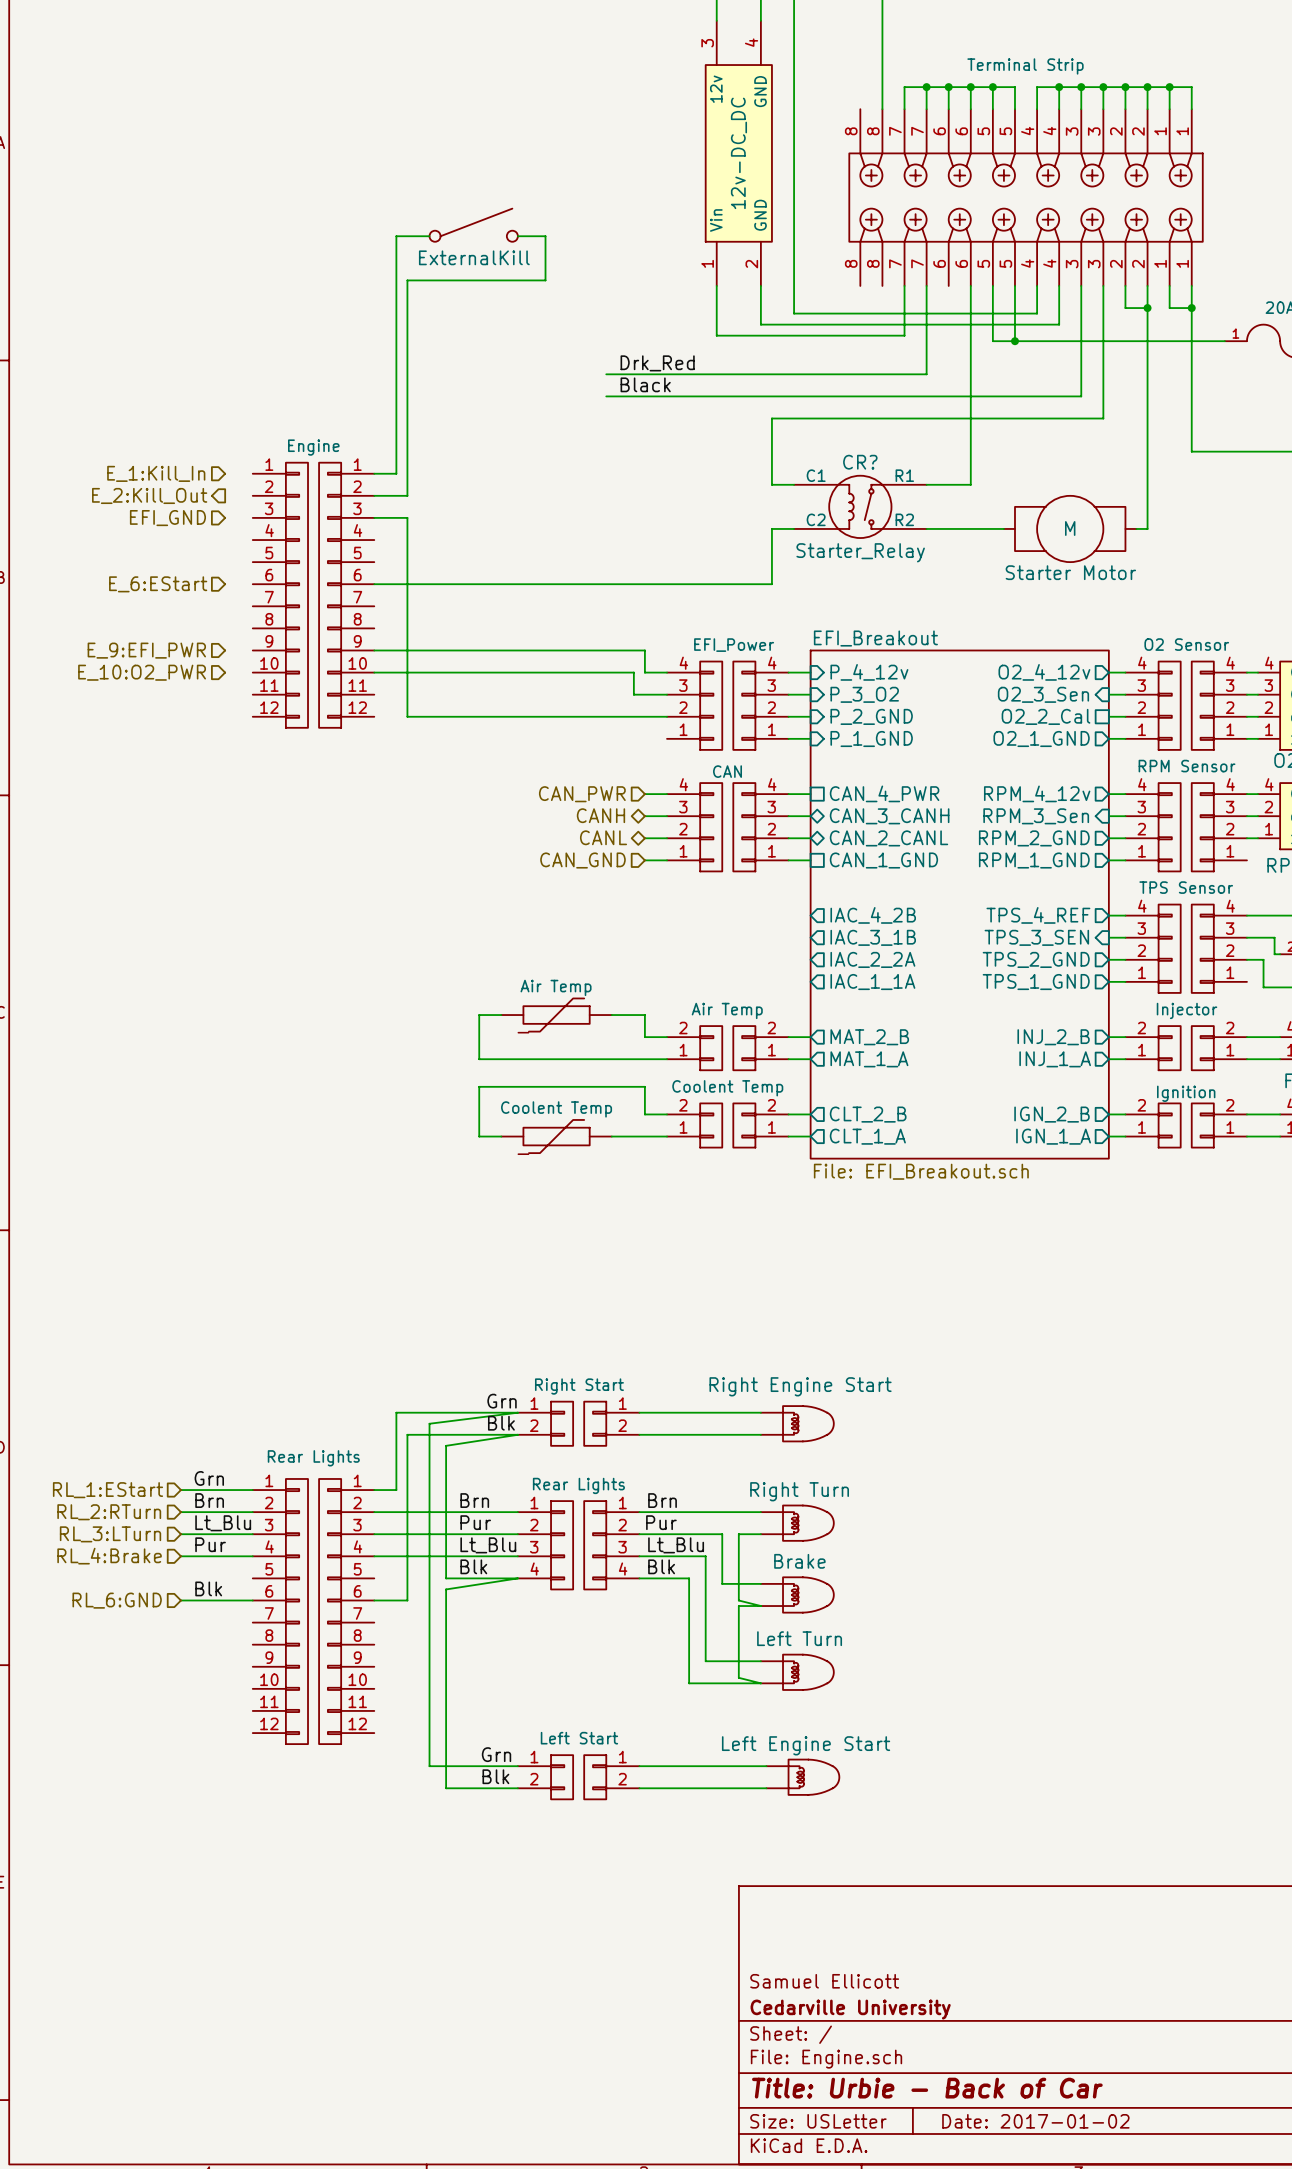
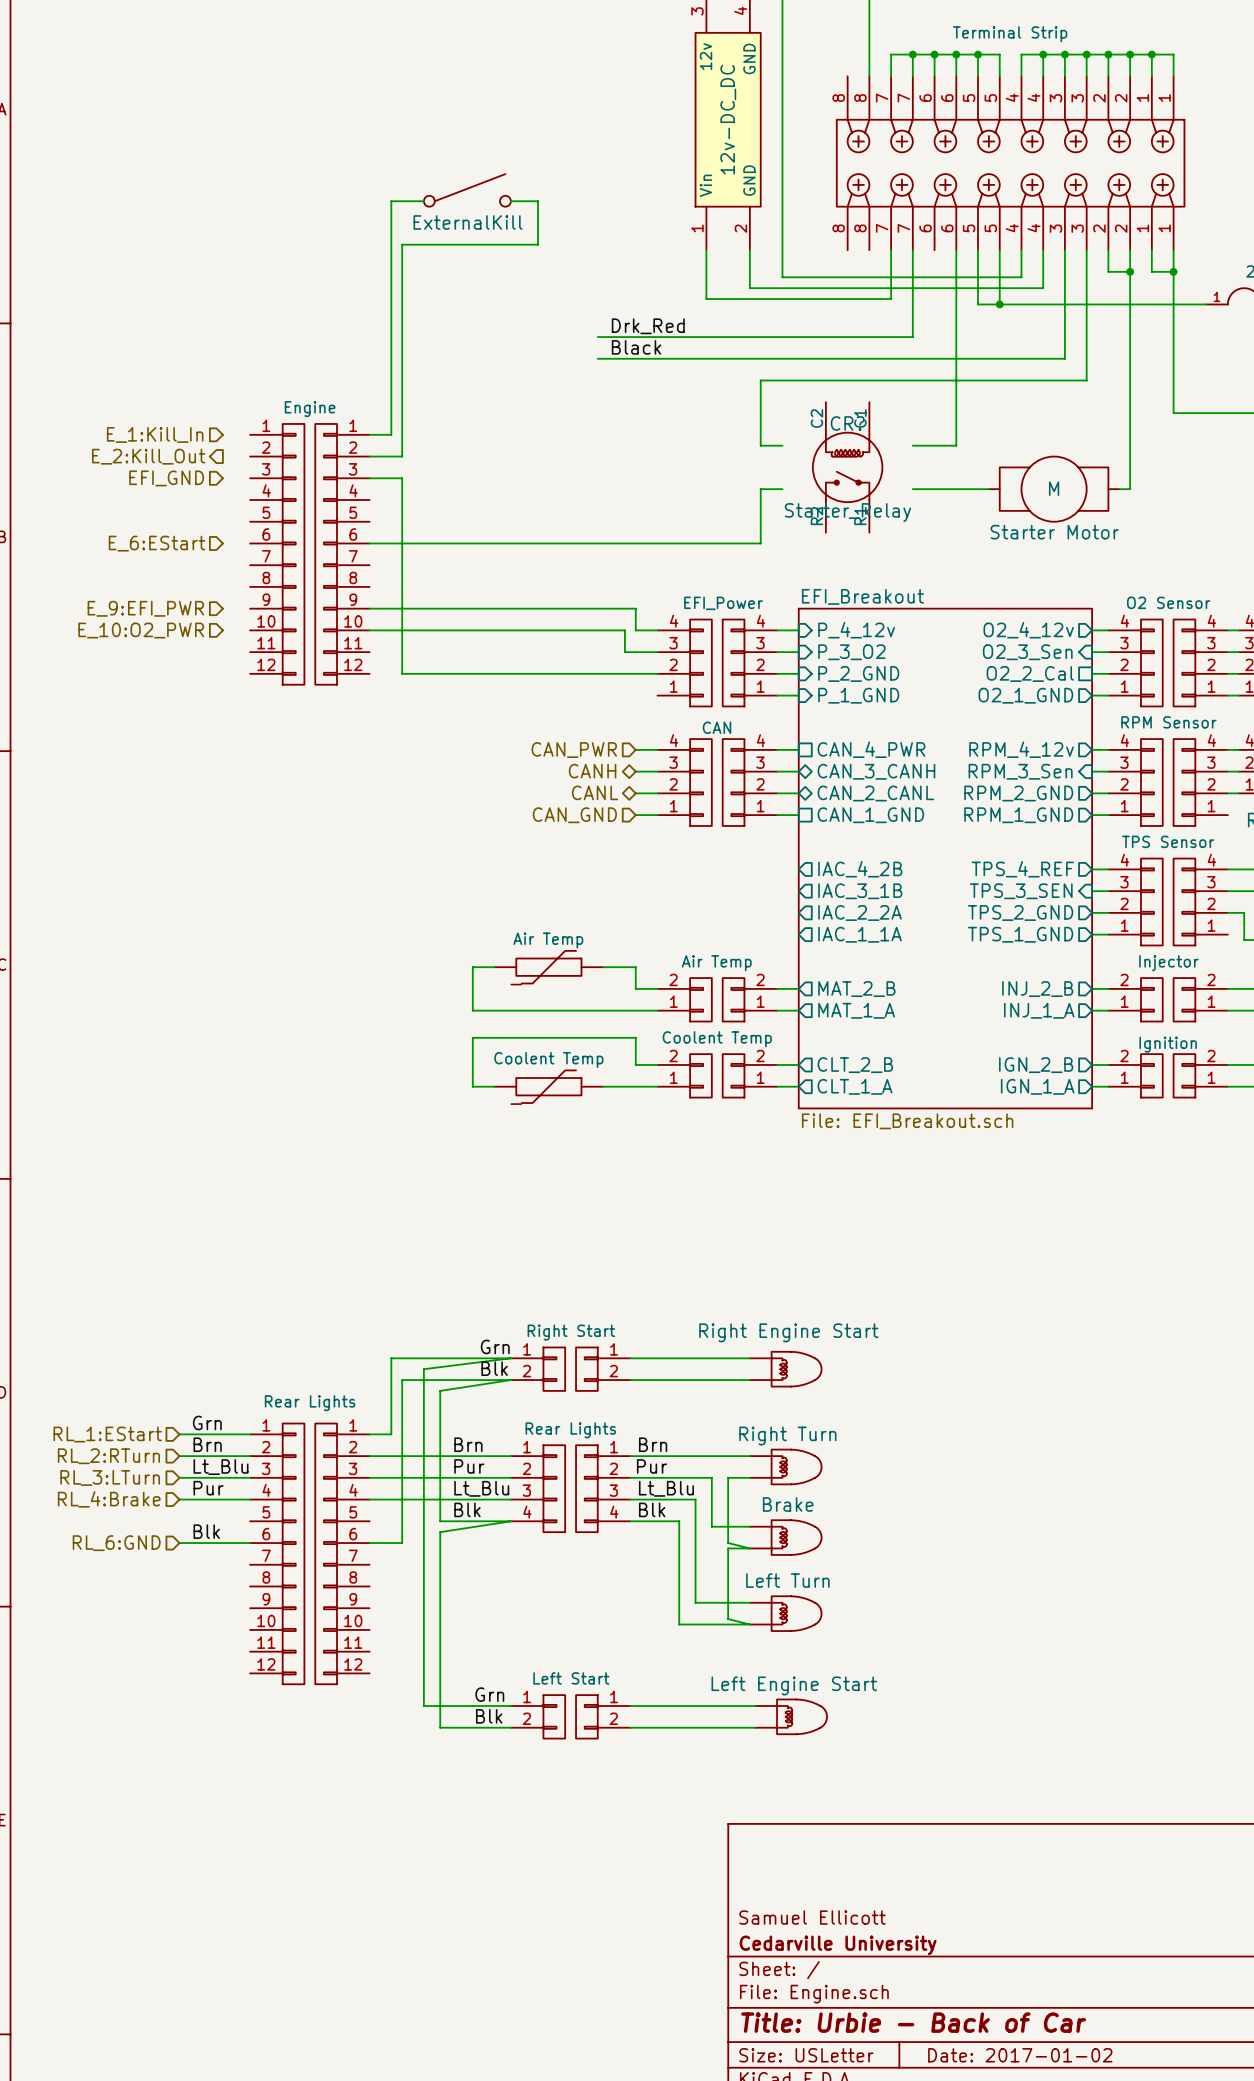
CR? symbol: [794, 475, 927, 539] -> [812, 402, 883, 533]

